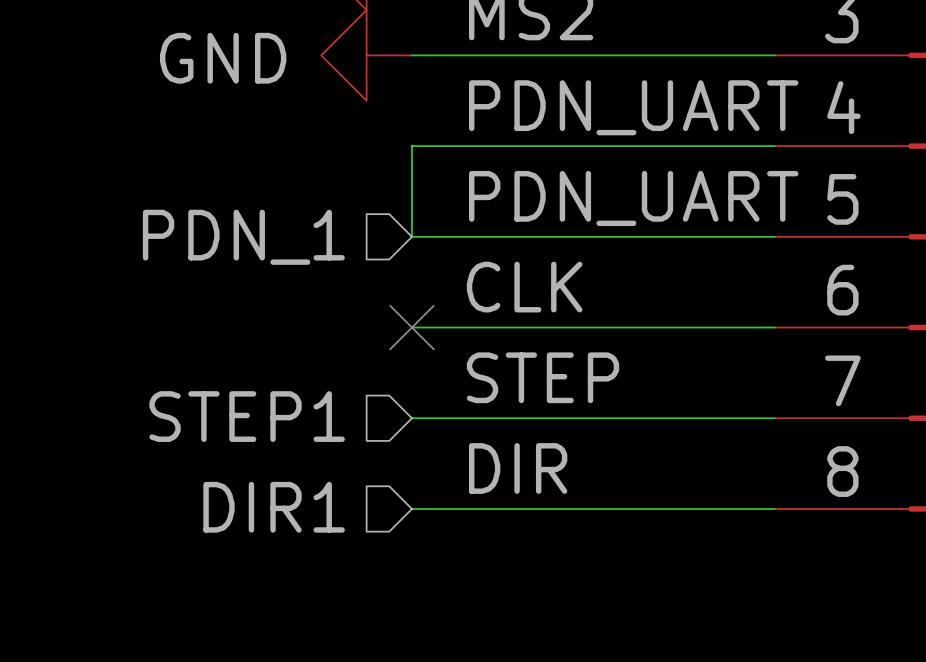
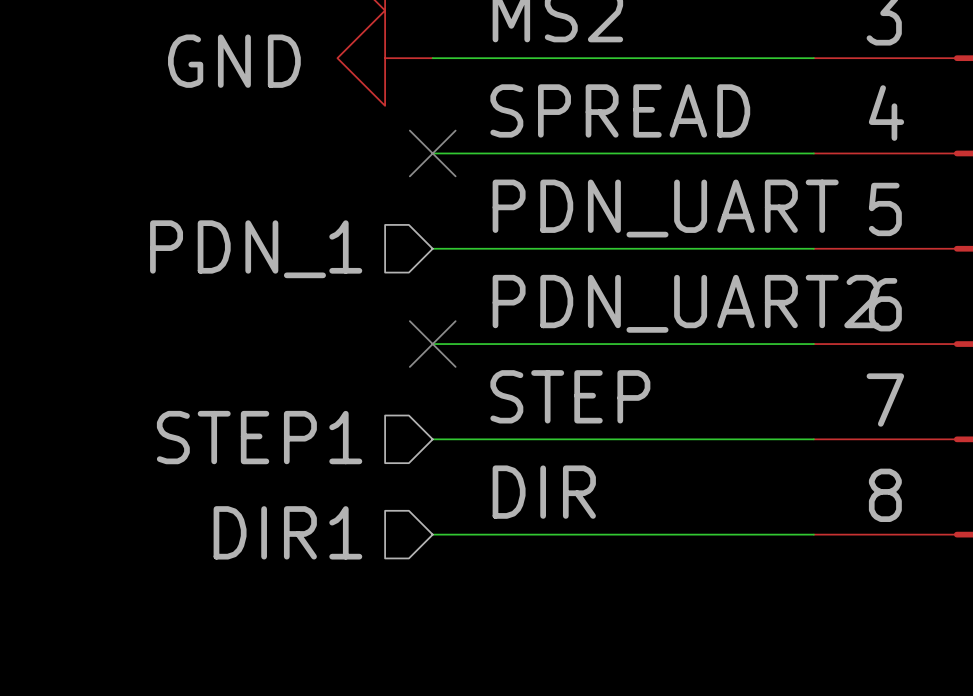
label: PDN_UART (633, 107) -> SPREAD (620, 110)
wire: (411, 146) (411, 236) -> none
no-connect mark: none -> (432, 153)
label: CLK (524, 287) -> PDN_UART2 (686, 303)

